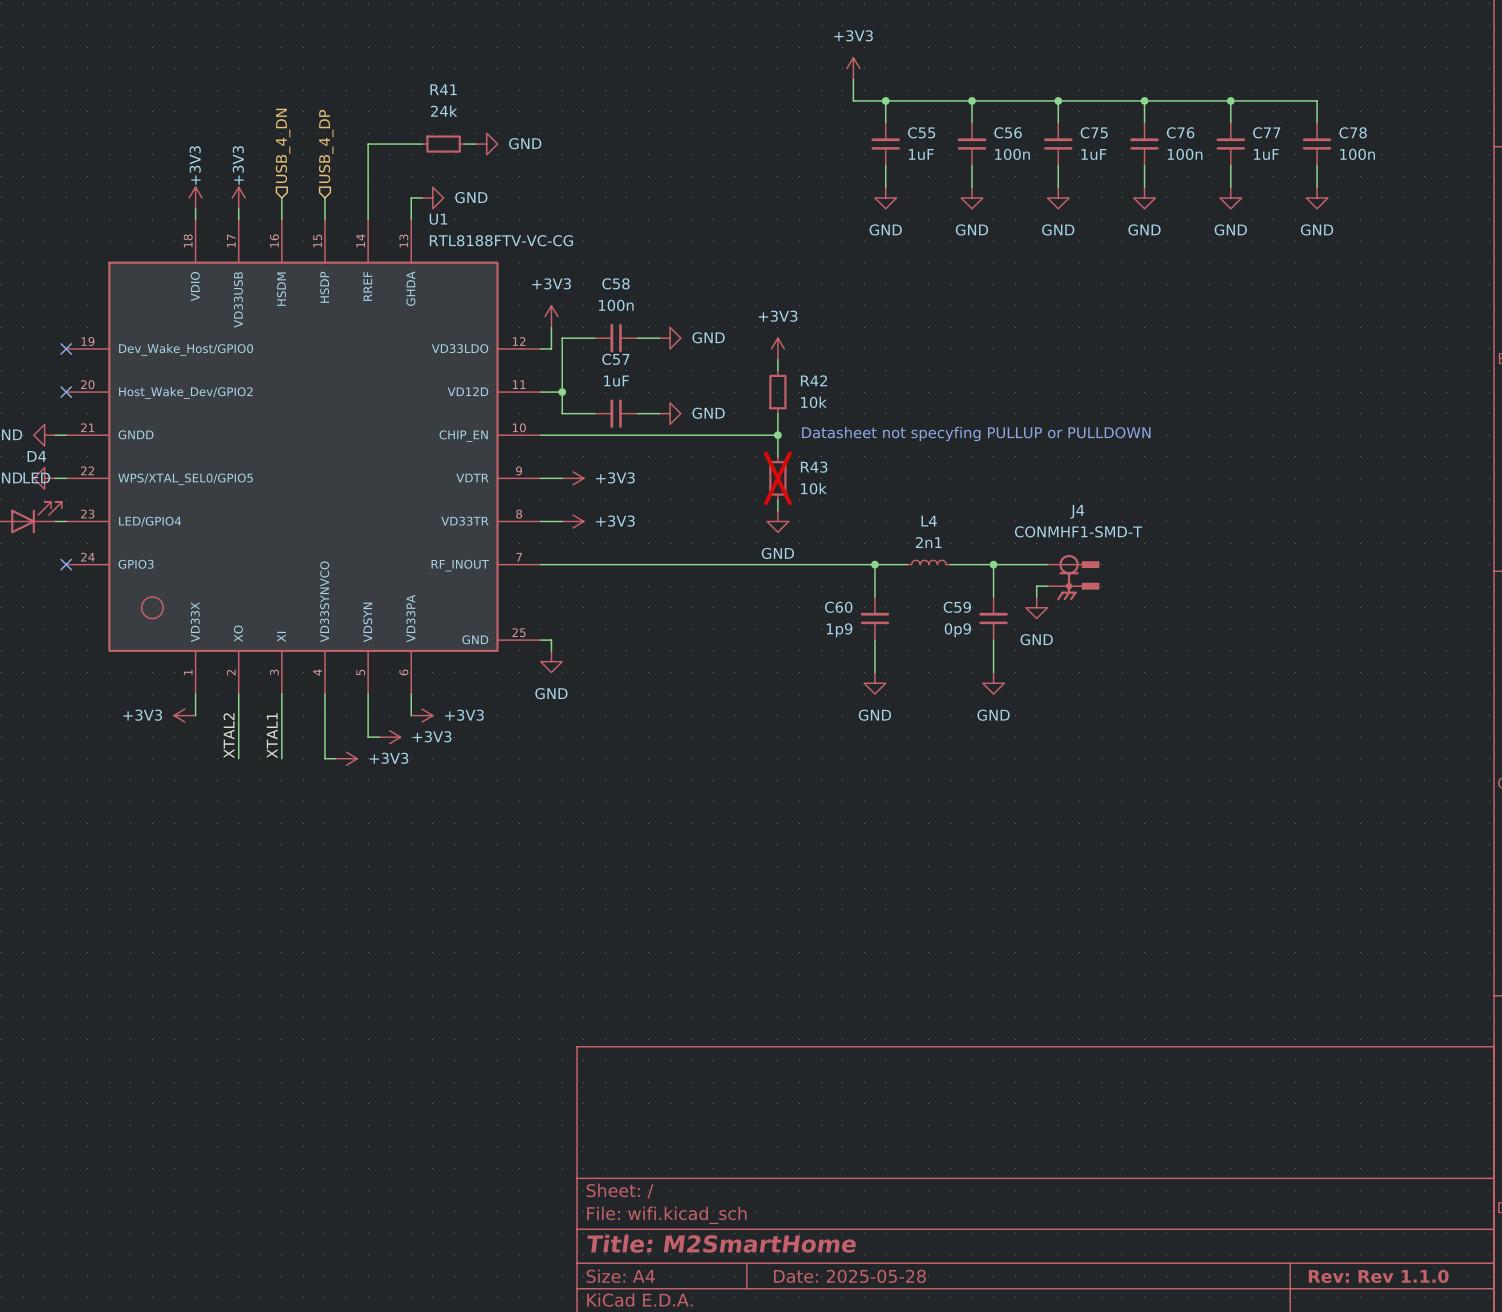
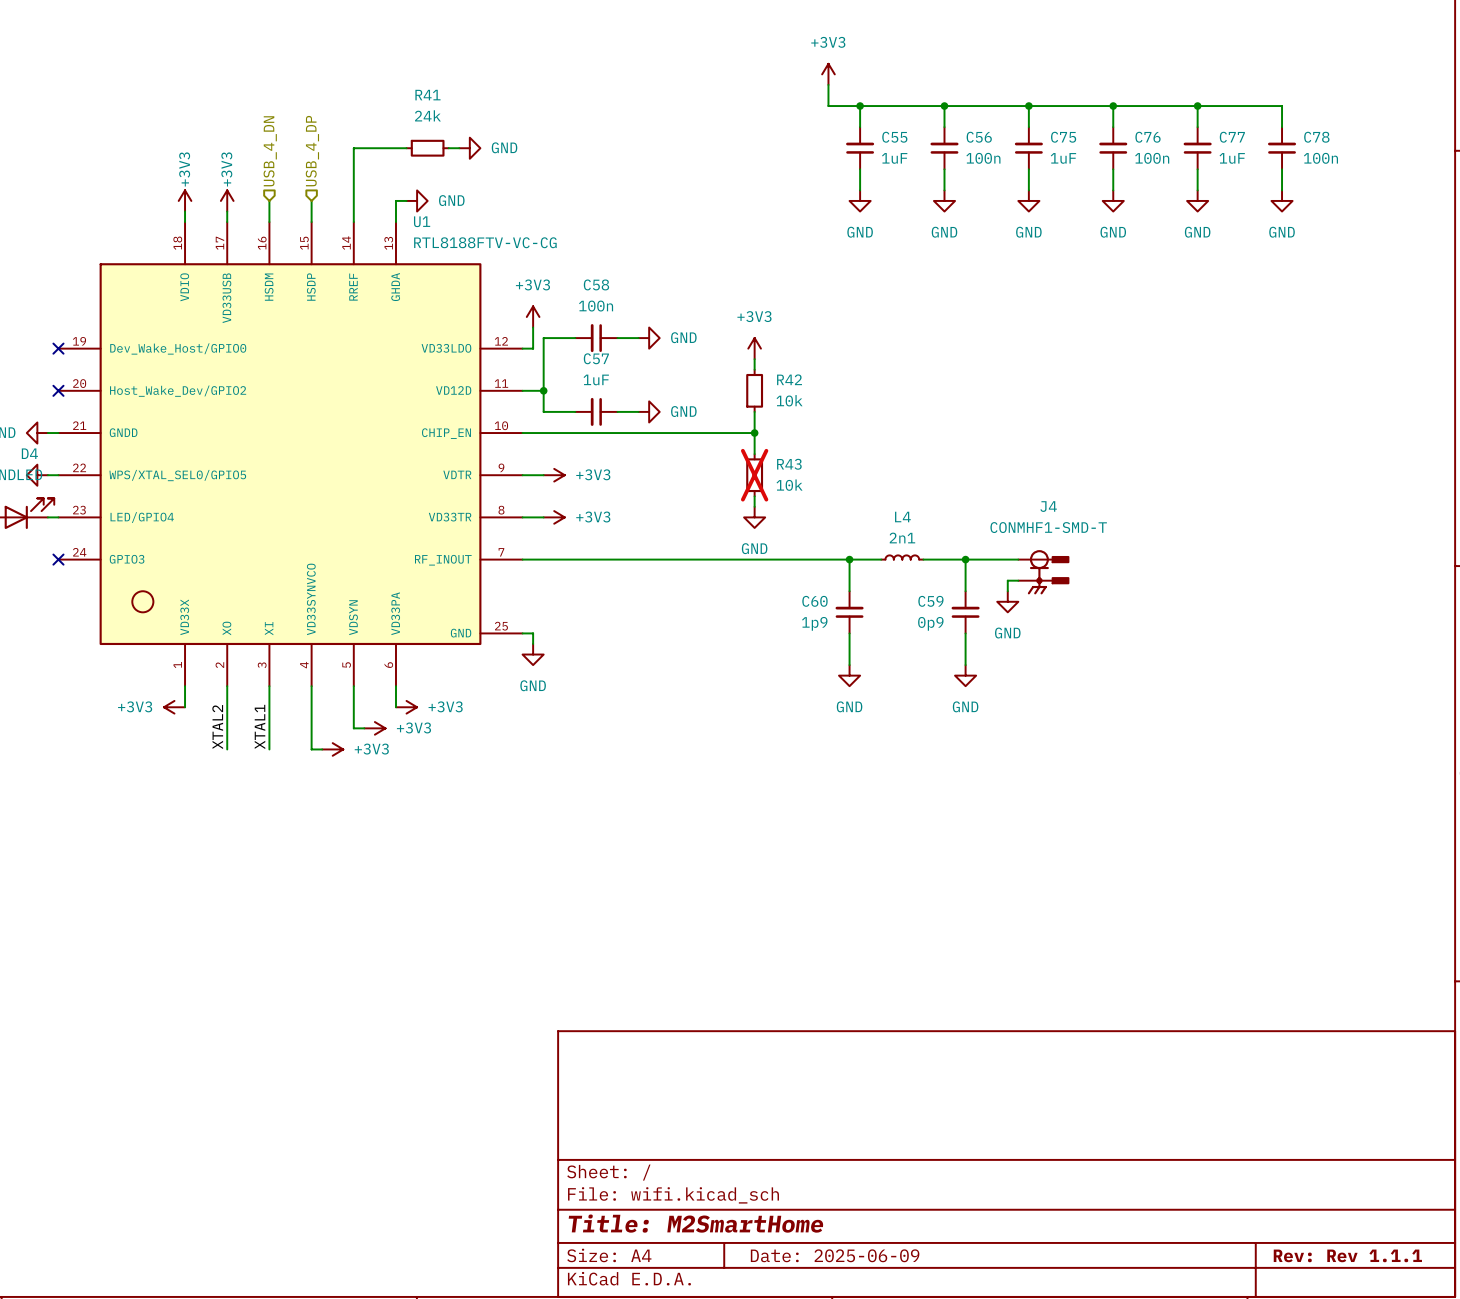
text: Datasheet not specyfing PULLUP or PULLDOWN (976, 434) -> none
title block: Date: 2025-05-28 (849, 1276) -> Date: 2025-06-09 (835, 1255)
title block: Rev: Rev 1.1.0 (1378, 1276) -> Rev: Rev 1.1.1 (1347, 1255)

